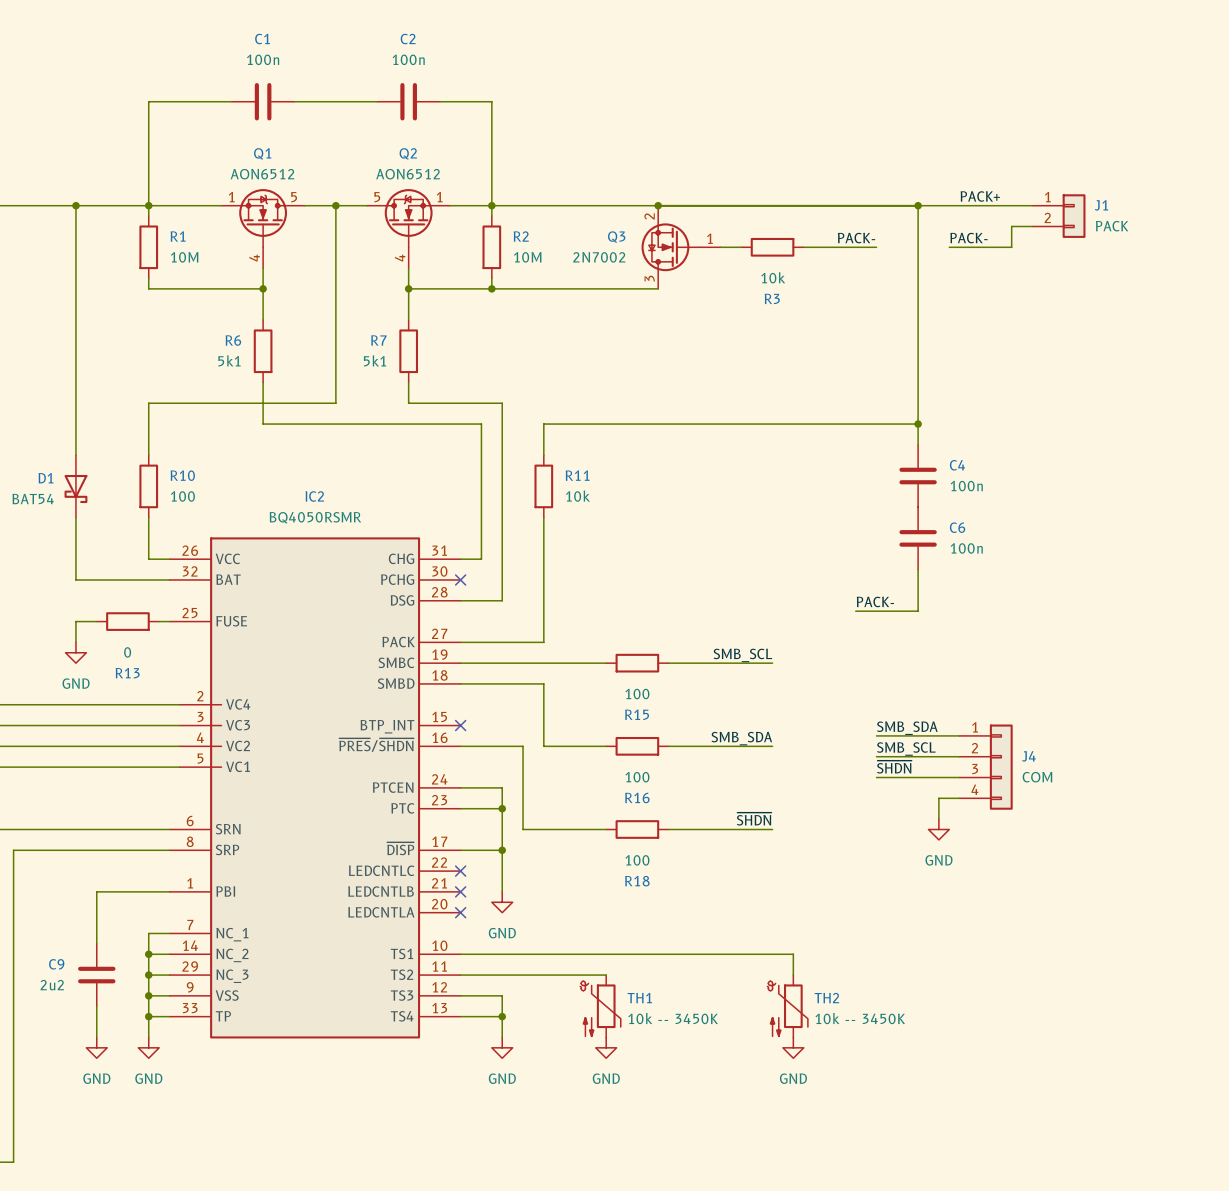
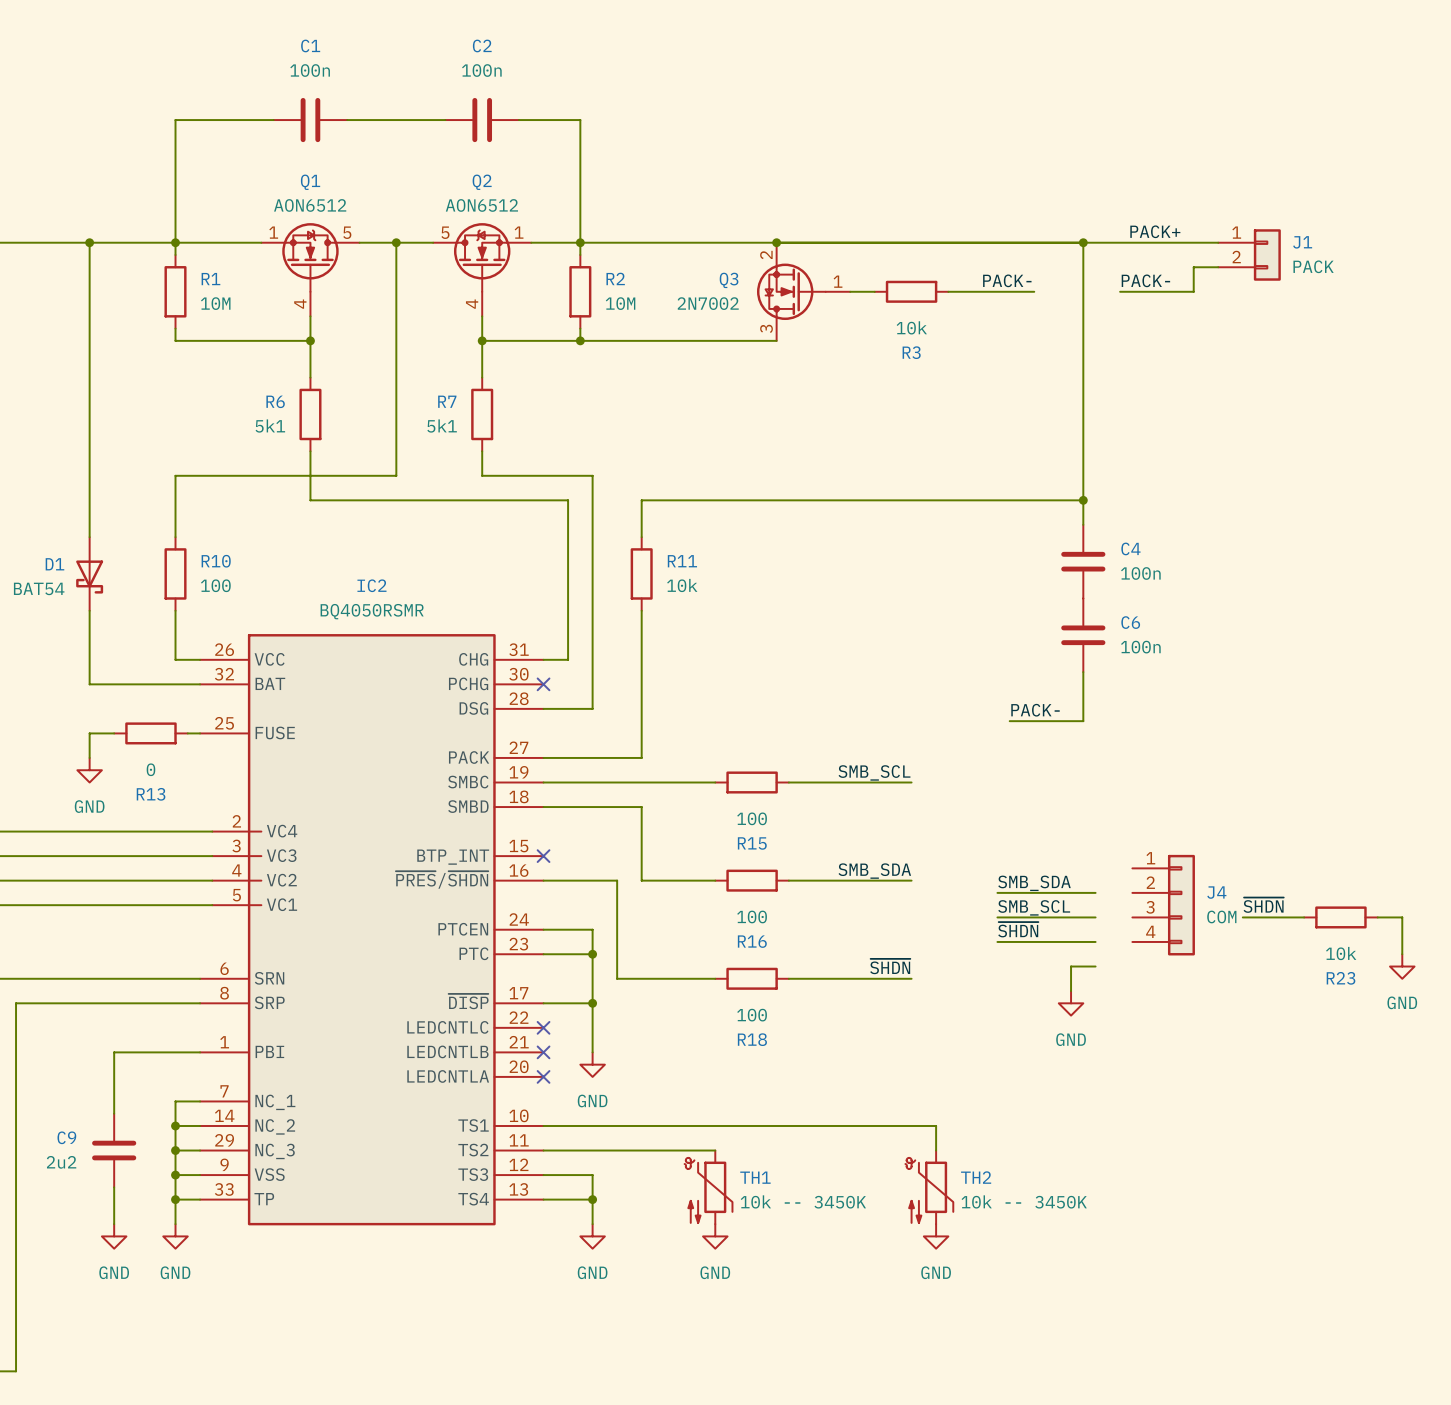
label position: SMB_SDA (907, 728) -> SMB_SDA (1034, 883)
wire: (876, 735) (959, 735) -> (997, 941) (1095, 941)
label position: SMB_SCL (906, 749) -> SMB_SCL (1034, 907)
wire: (928, 756) (959, 756) -> (997, 892) (1034, 892)
label position: ~{SHDN} (894, 767) -> ~{SHDN} (1018, 929)
label: none -> ~{SHDN} (1263, 905)
wire: (928, 777) (959, 777) -> (997, 917) (1034, 917)
wire: none -> (1242, 917) (1304, 917)
R23: none -> 10k (1340, 917)
wire: none -> (1377, 917) (1402, 917) (1402, 954)
wire: (959, 798) (938, 798) (938, 819) -> (1095, 966) (1071, 966) (1071, 991)
power symbol: none -> GND (1402, 966)
power symbol position: GND (938, 829) -> GND (1071, 1003)

